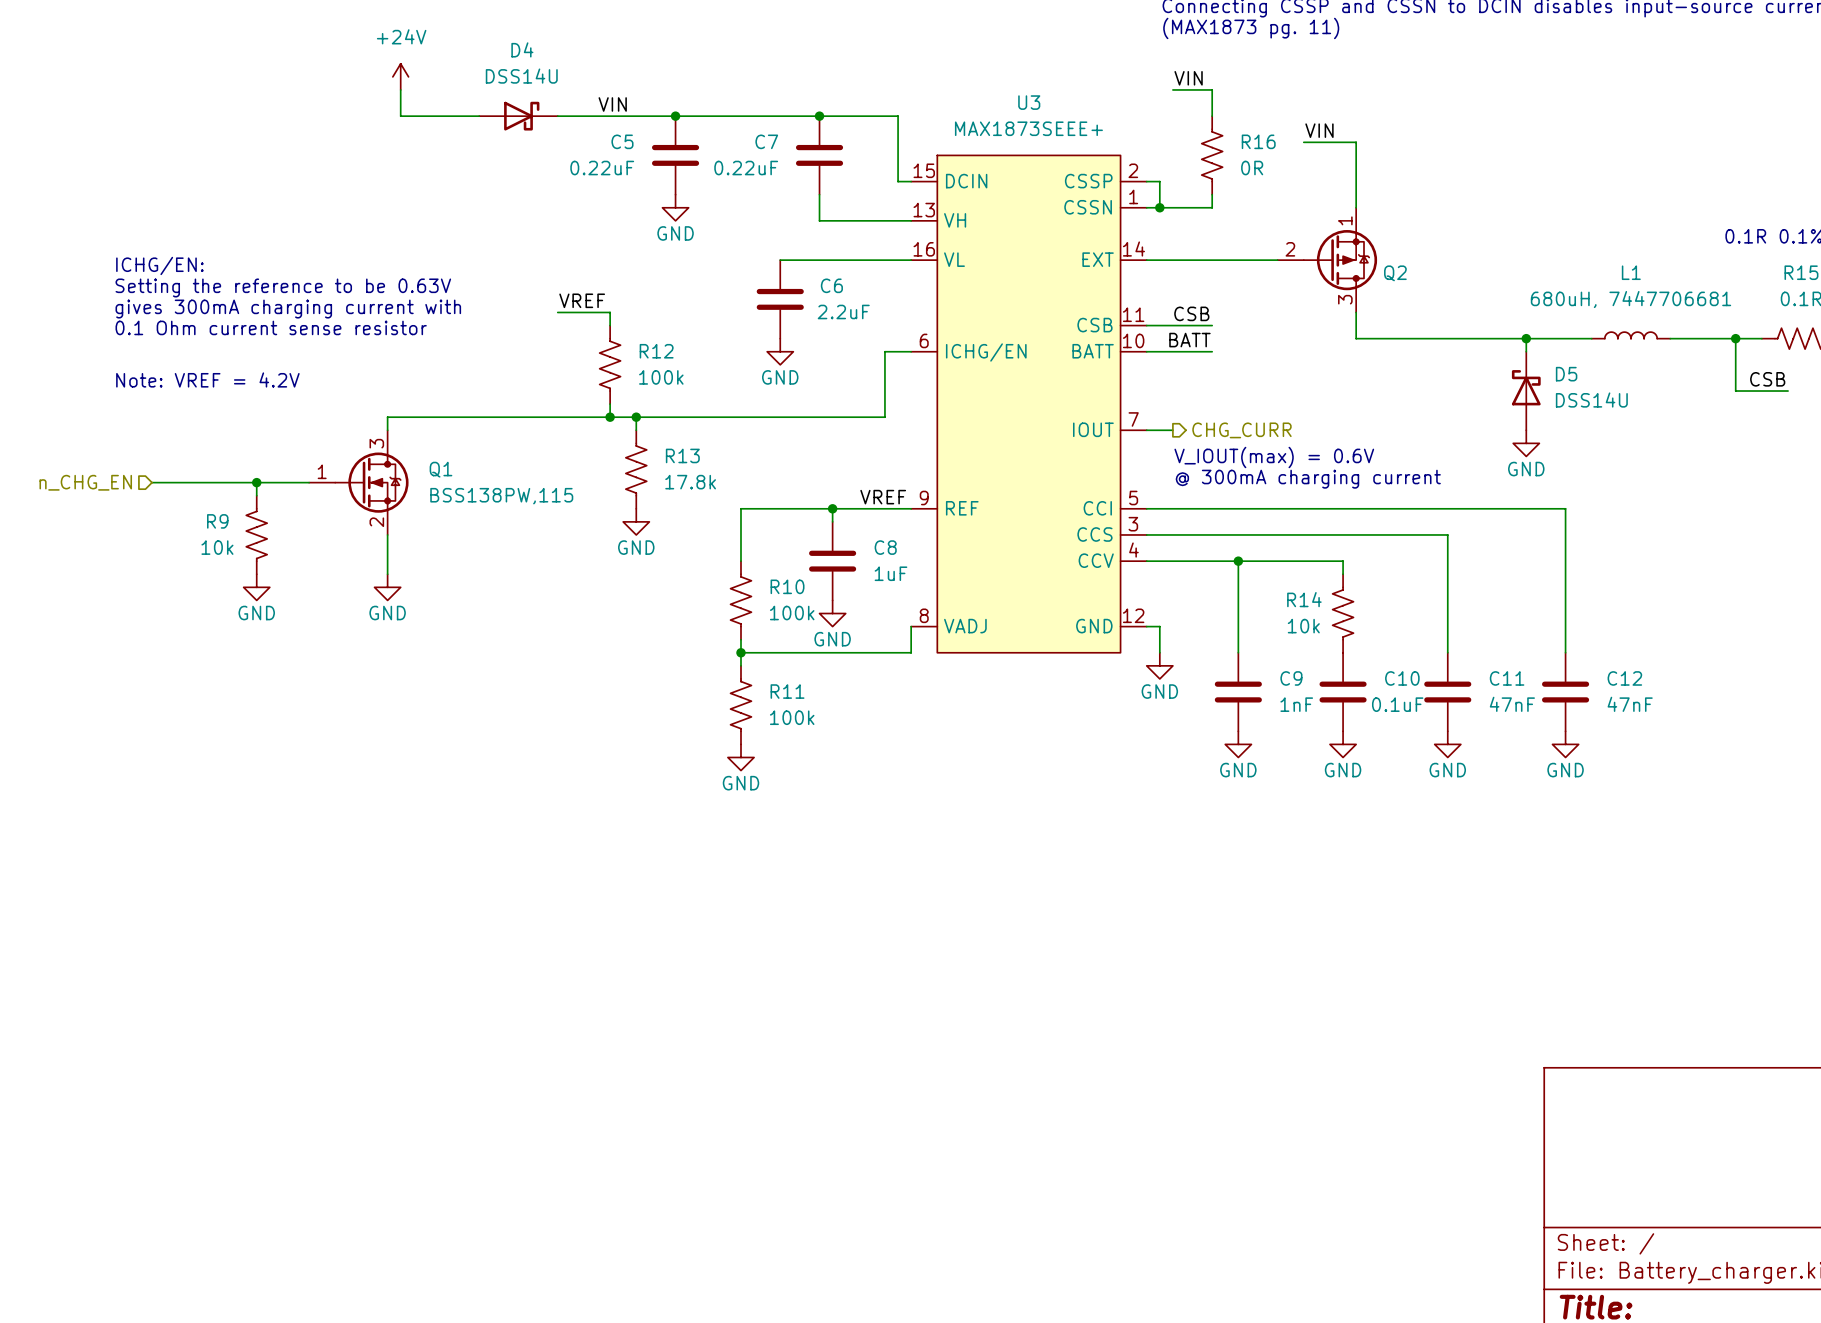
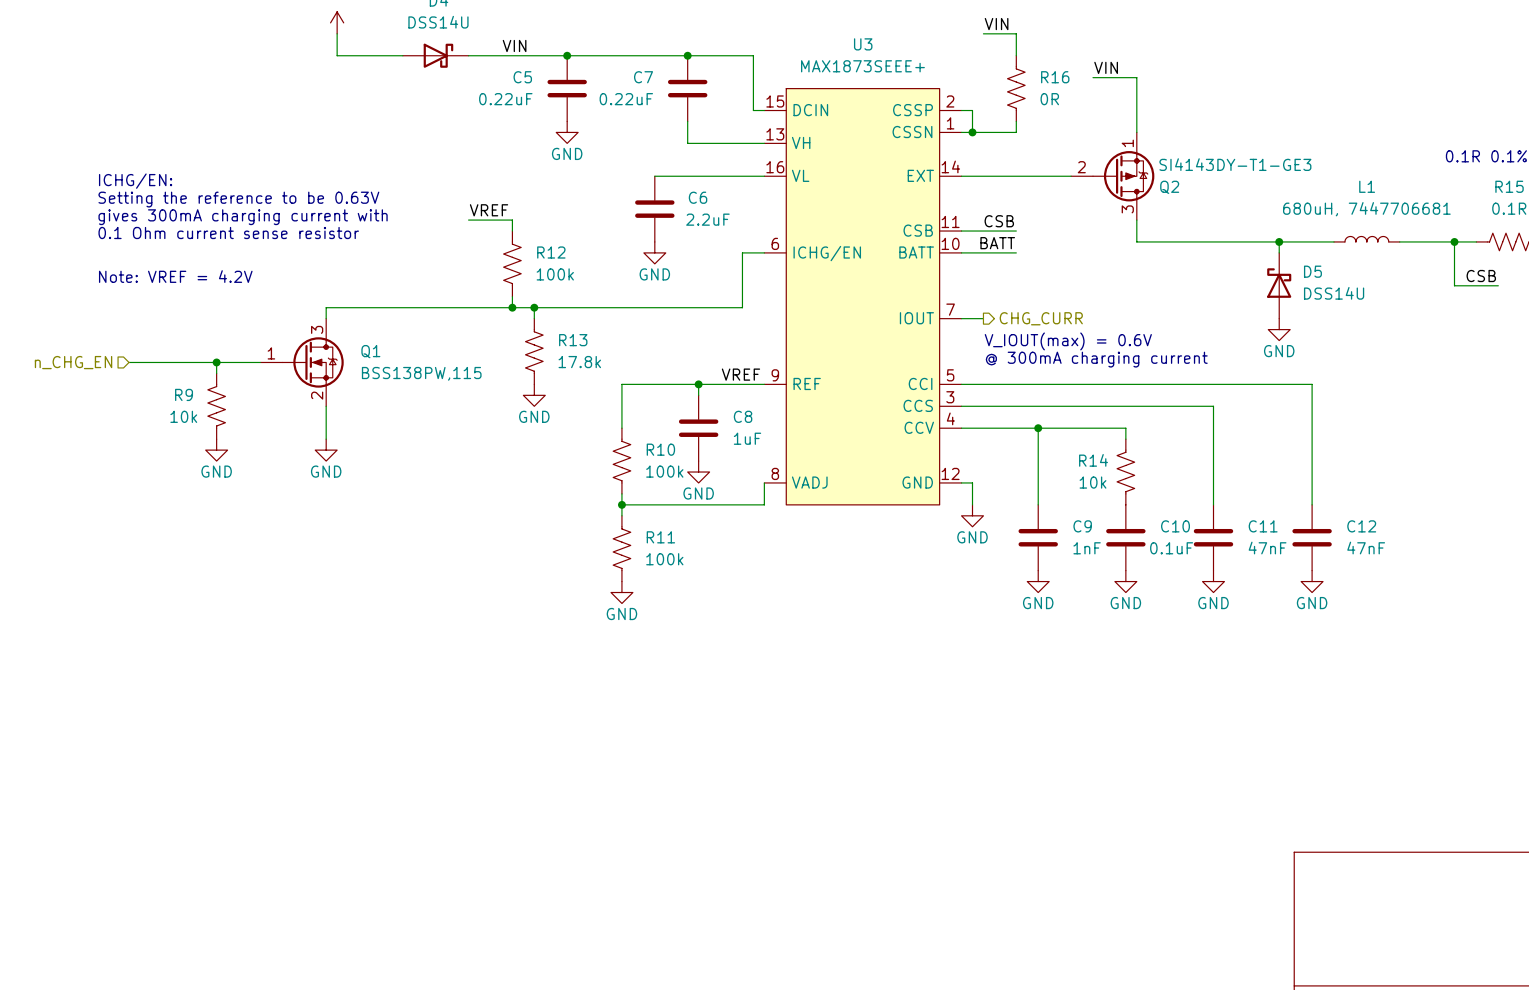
Q2 value: none -> SI4143DY-T1-GE3 (1235, 164)

